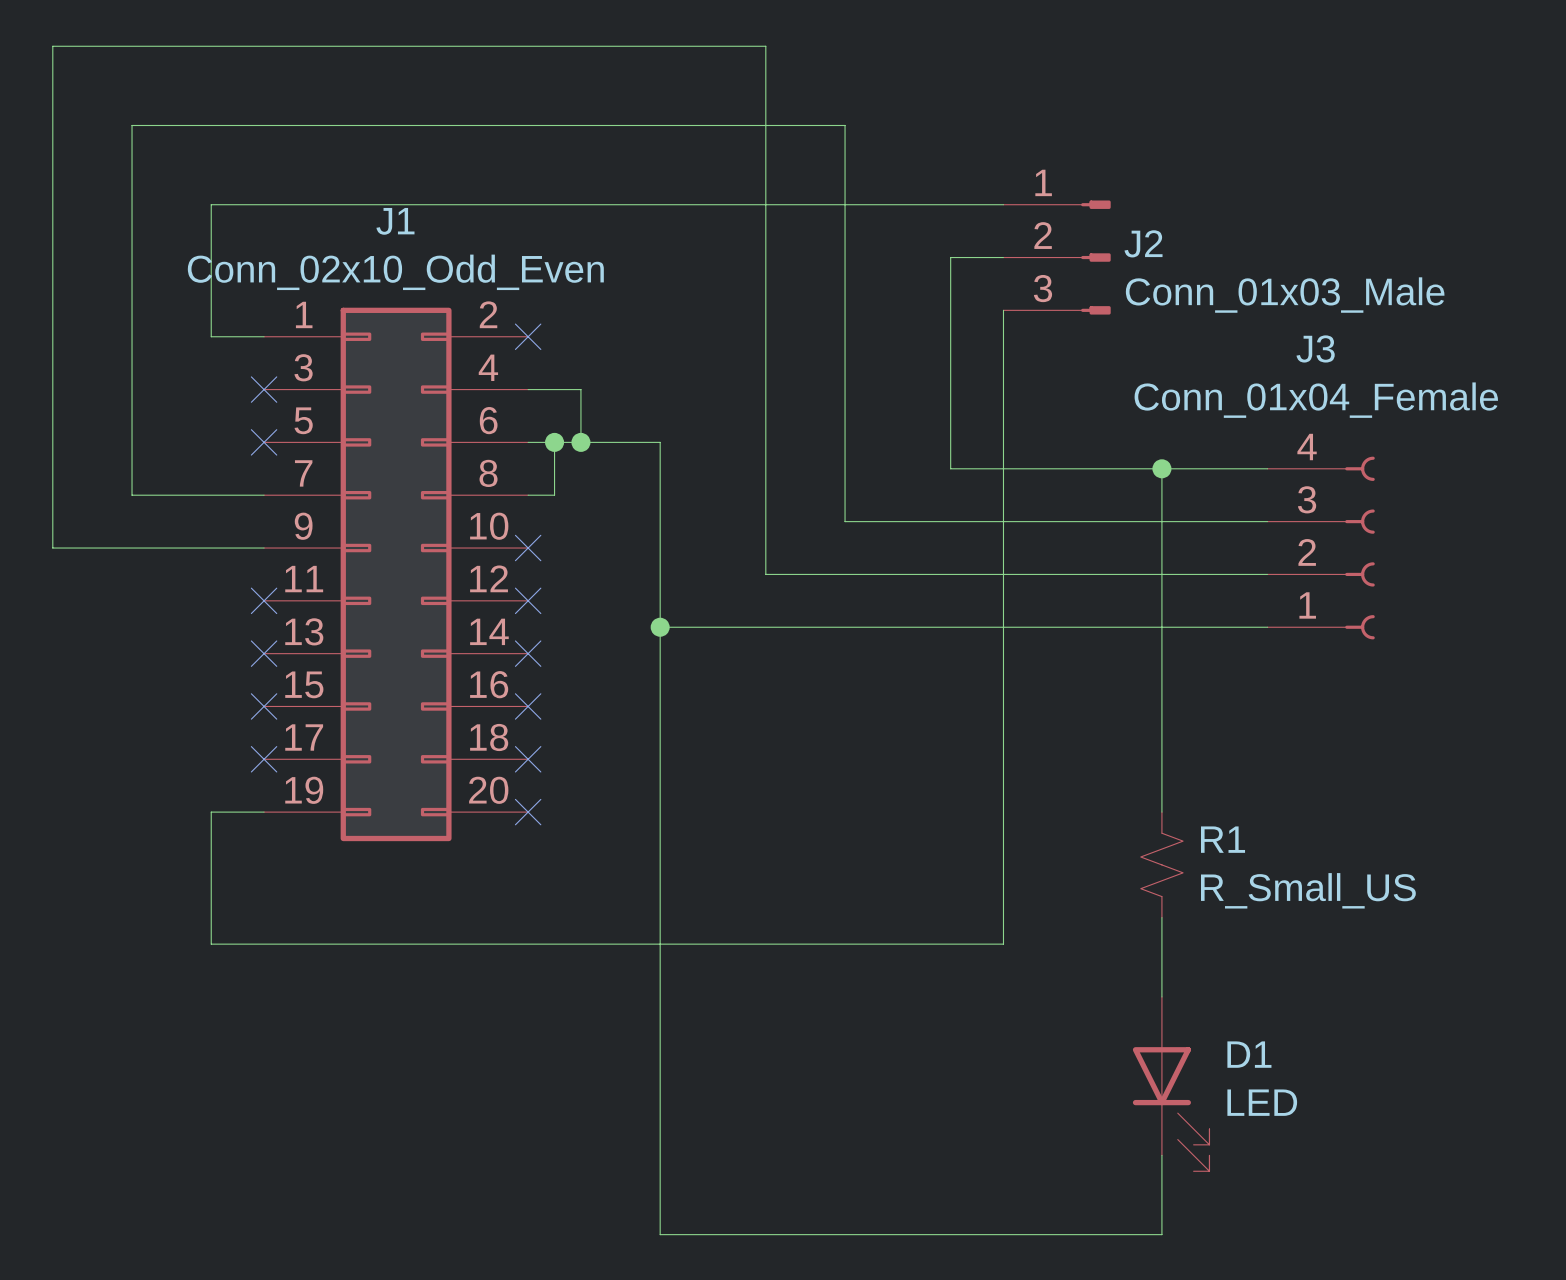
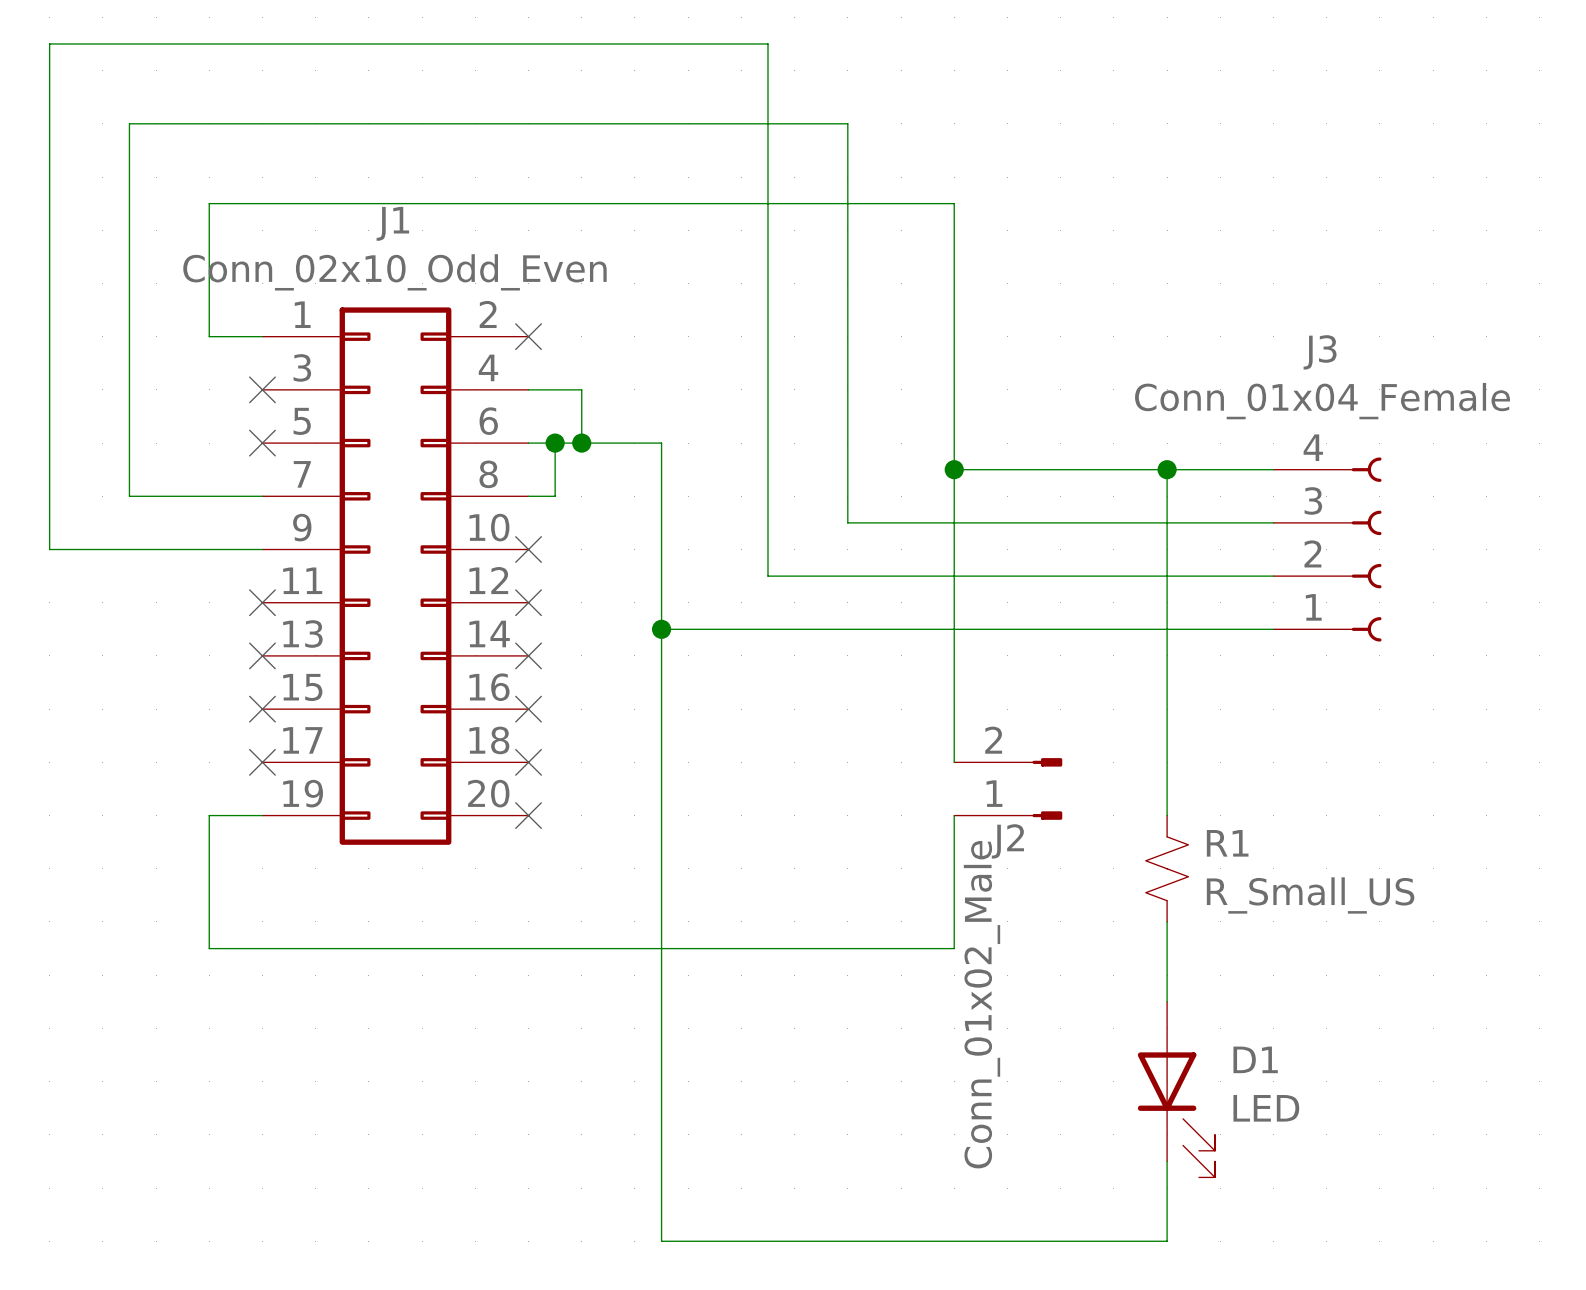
J2 symbol: [1003, 200, 1111, 315] -> [954, 758, 1063, 820]
wire: (950, 204) (1003, 204) -> (954, 203) (954, 256)
J2 name position: J2 (1143, 243) -> J2 (1007, 841)
wire: (950, 257) (1003, 257) -> none
J2 value: Conn_01x03_Male (1285, 295) -> Conn_01x02_Male (981, 1004)
wire: (1003, 310) (1003, 944) (950, 944) -> (954, 815) (954, 948)
wire: none -> (954, 469) (954, 762)
junction: none -> (954, 469)

